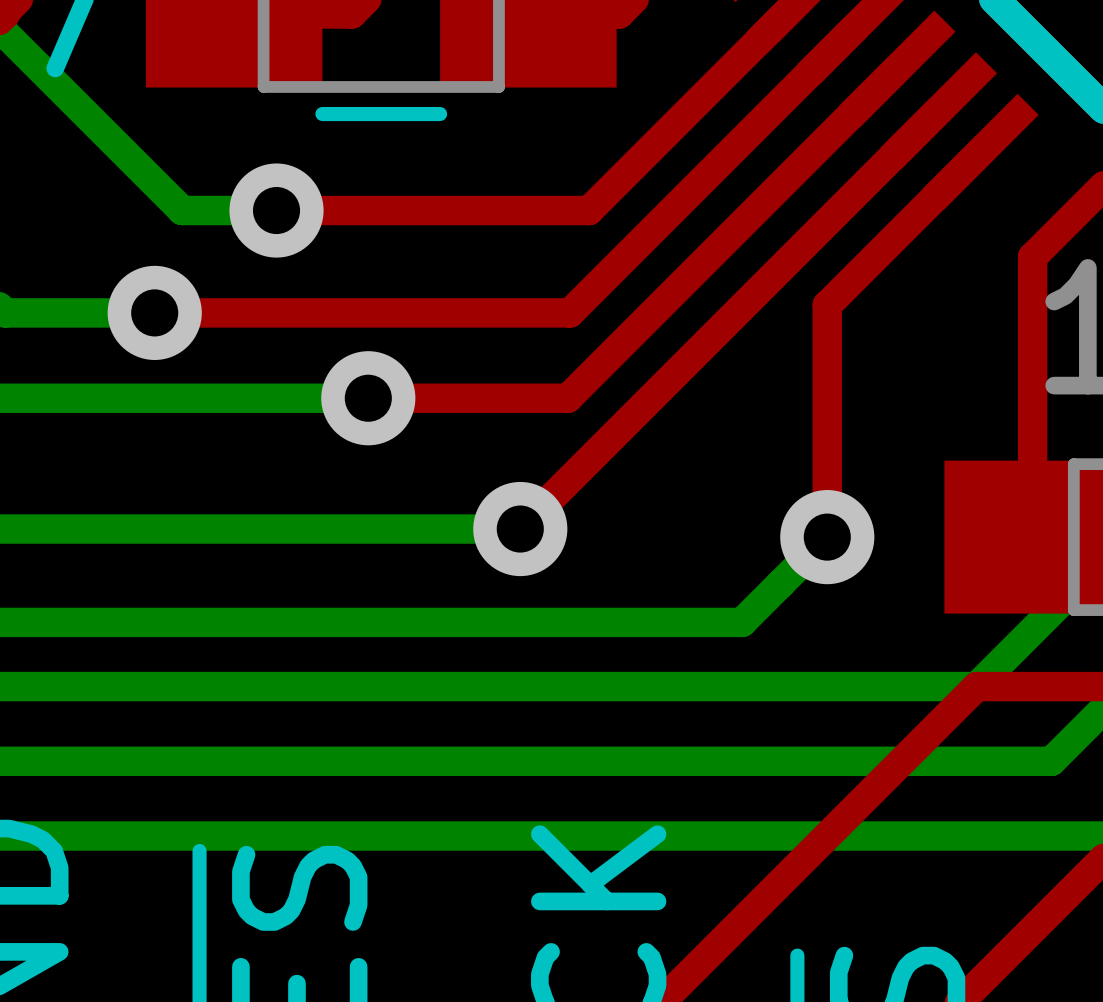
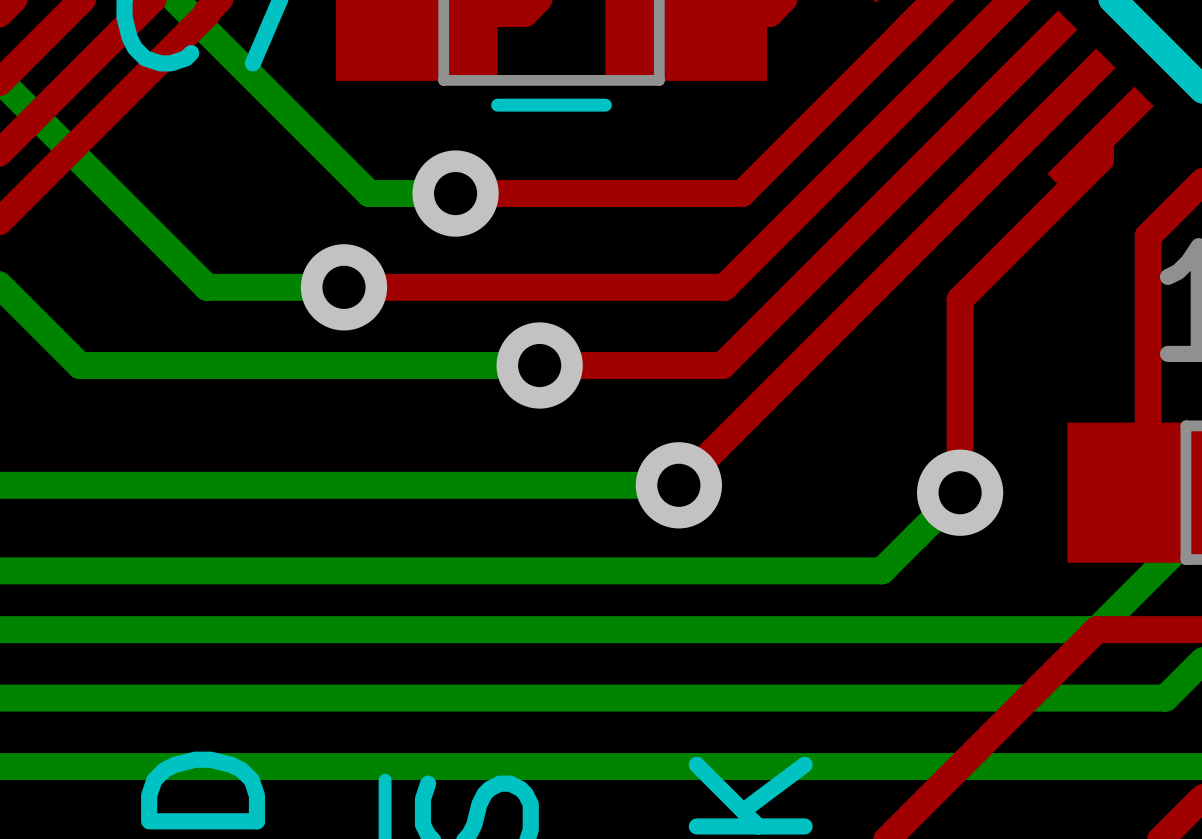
top track: (980, 151) (827, 305) (827, 326) -> (1100, 139) (1100, 159) (960, 299)

